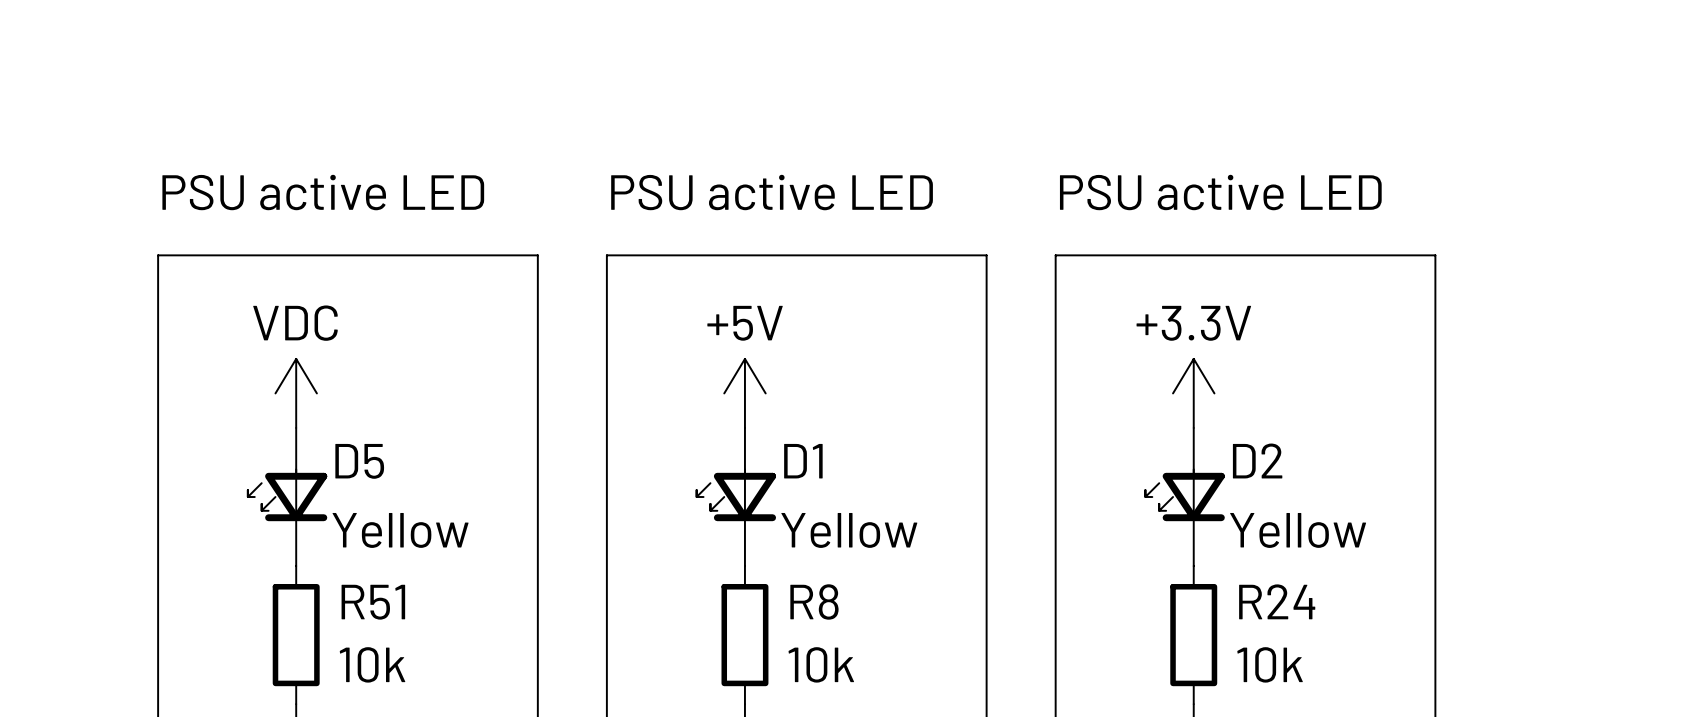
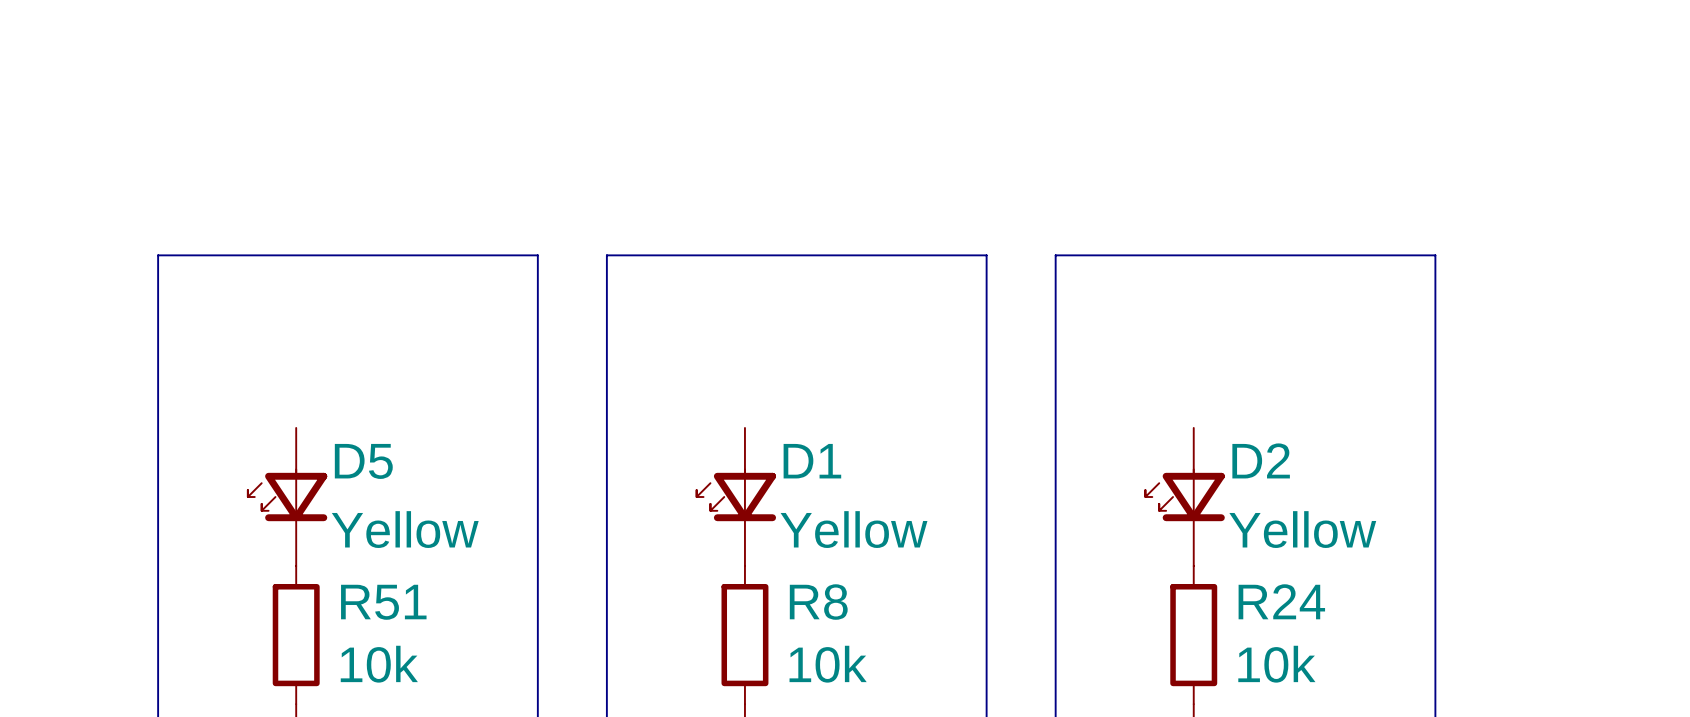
text: PSU active LED (323, 192) -> none
text: PSU active LED (772, 192) -> none
text: PSU active LED (1220, 192) -> none
power symbol: VDC (296, 393) -> none
power symbol: +5V (744, 393) -> none
power symbol: +3.3V (1193, 393) -> none

